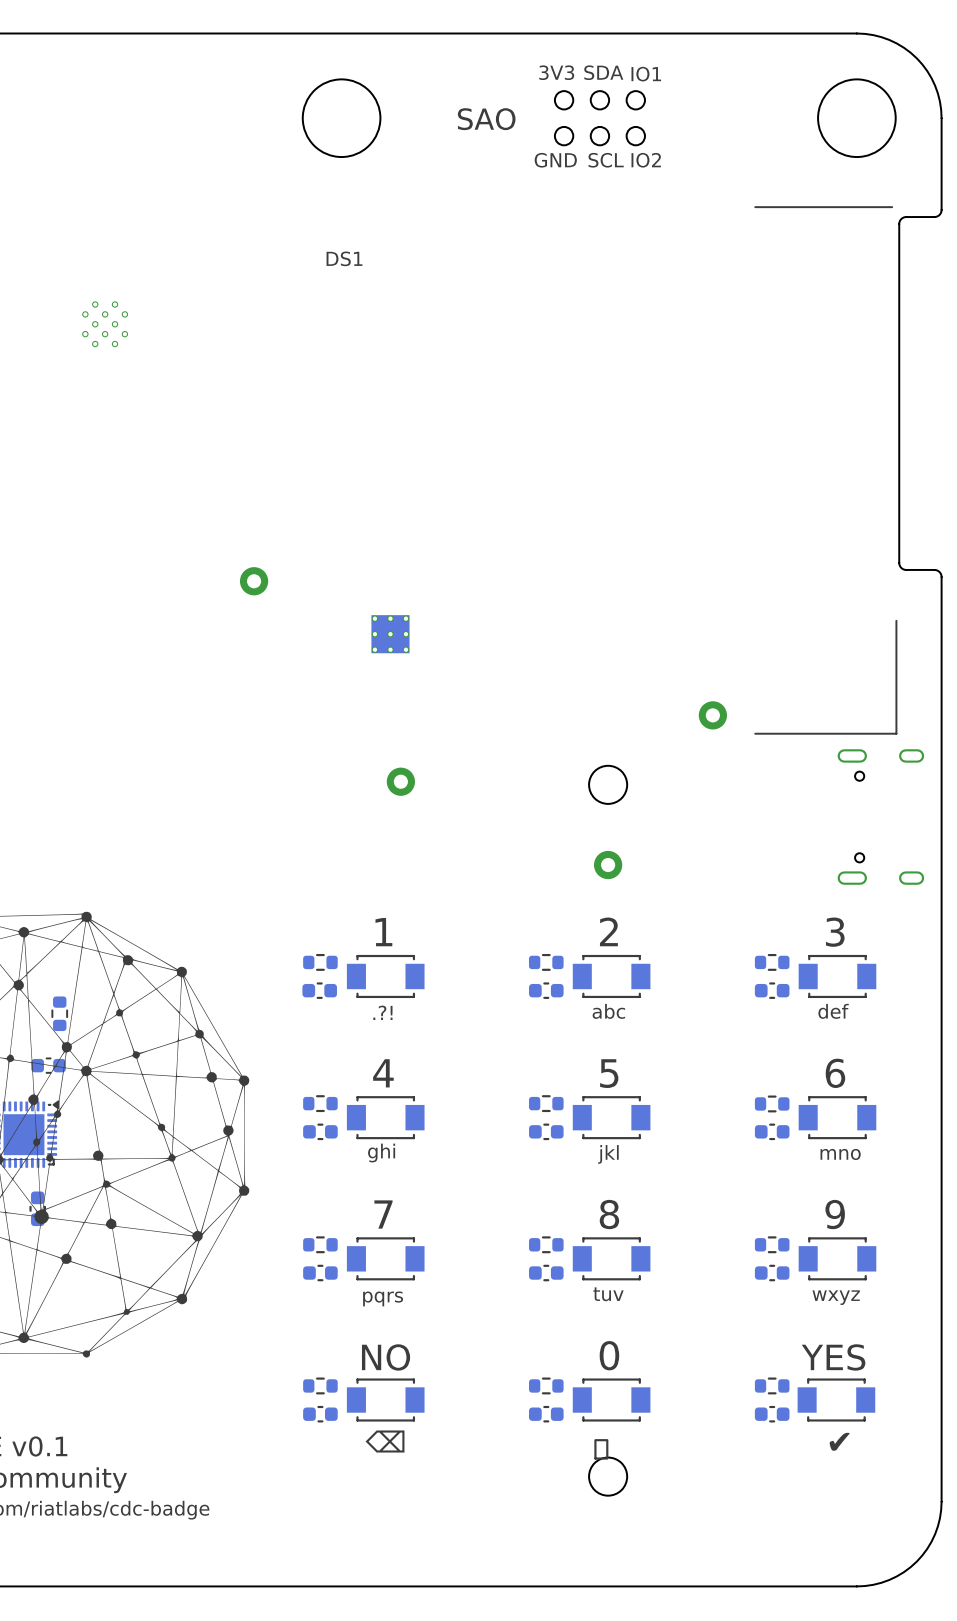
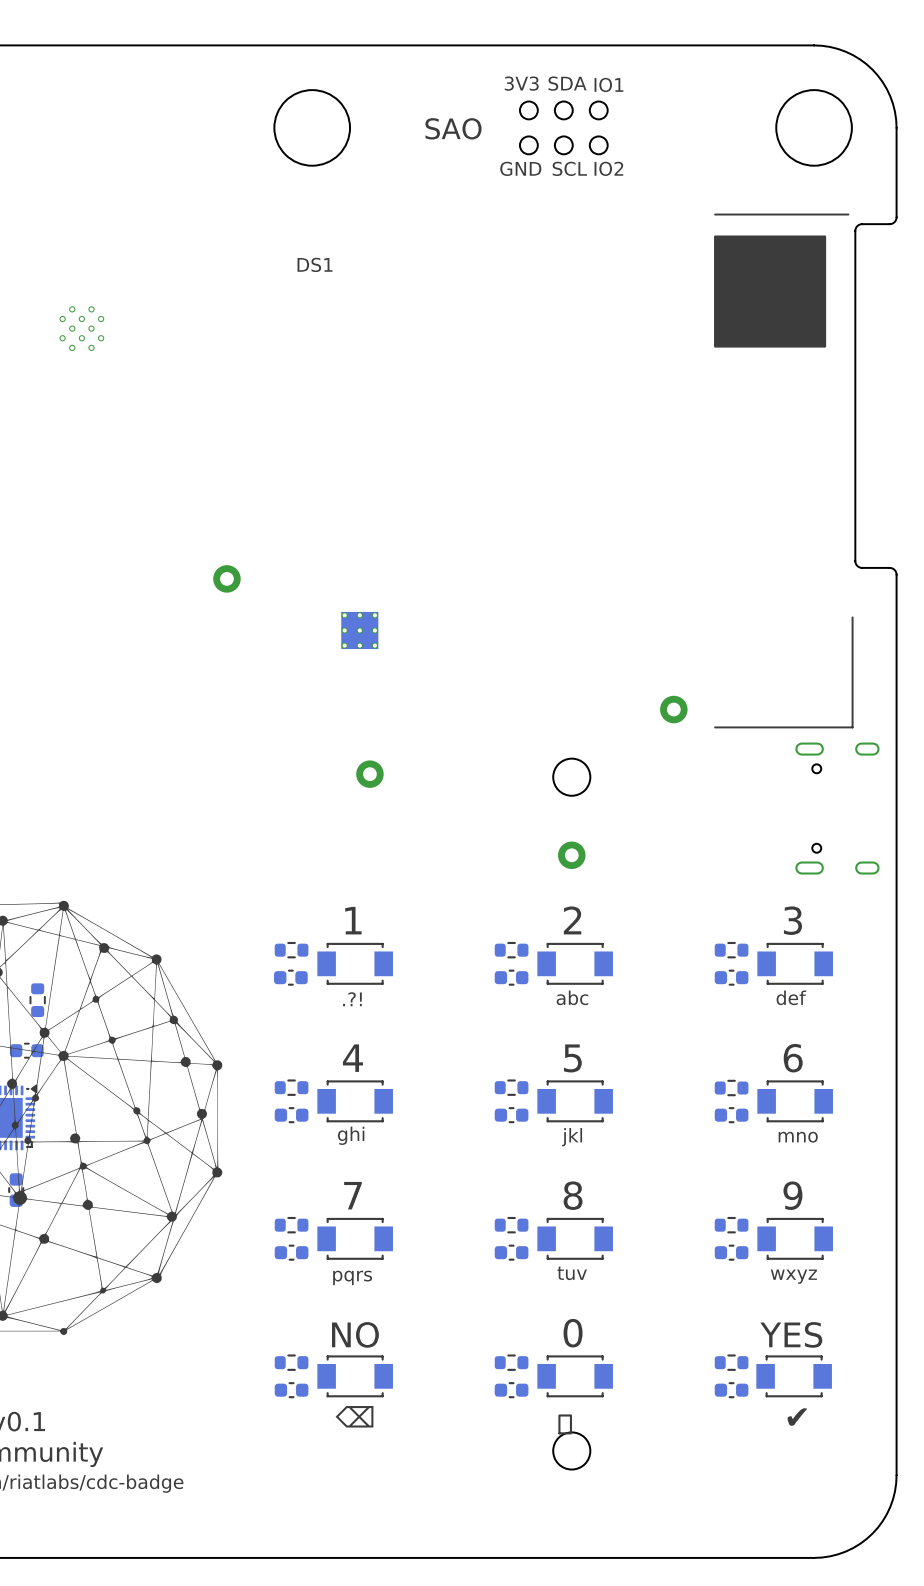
drawing: none -> [714, 235, 827, 348]

